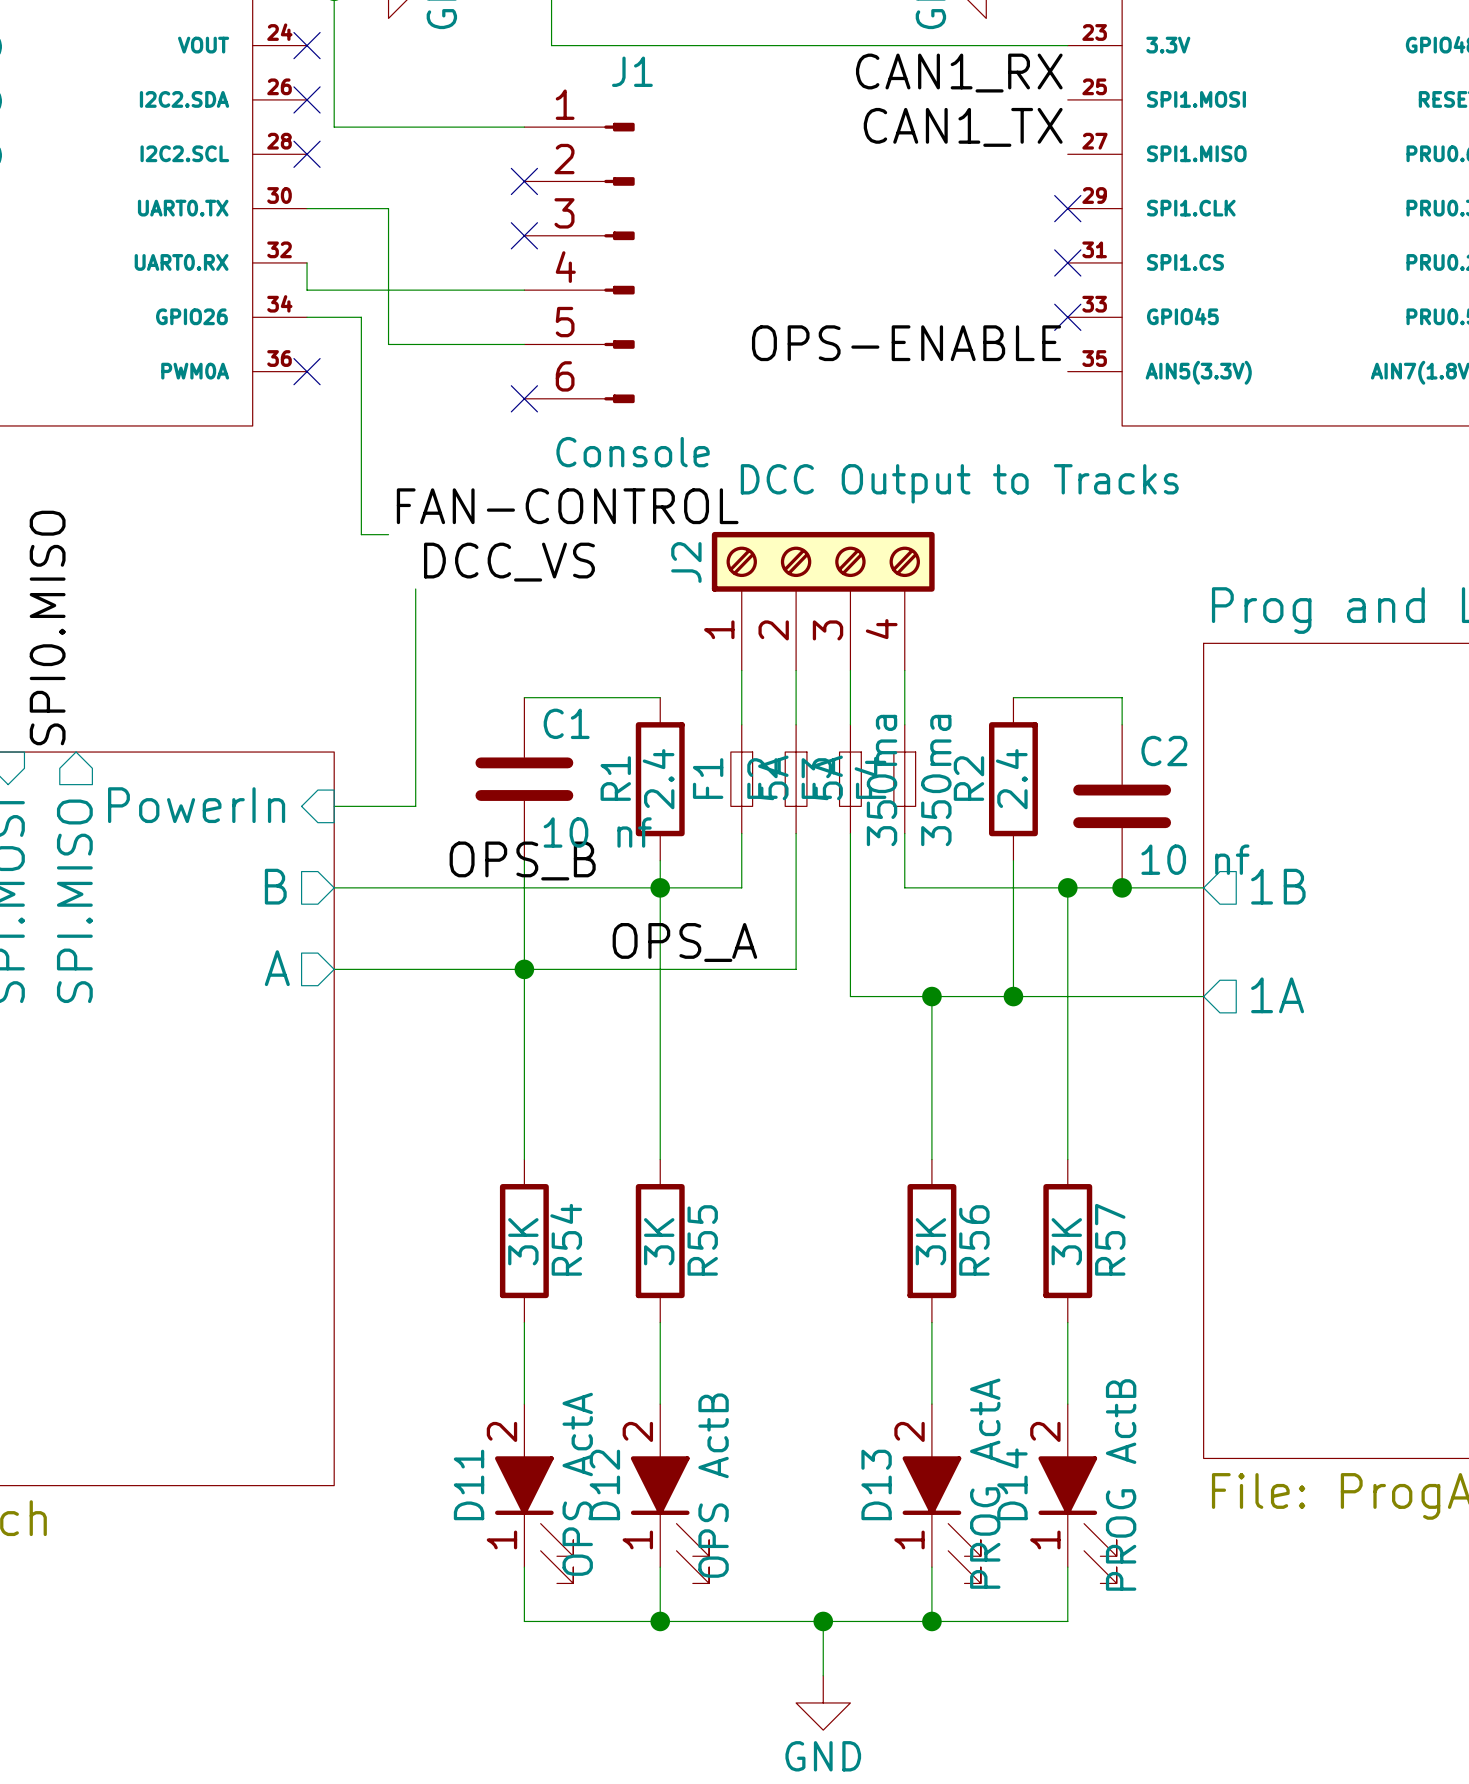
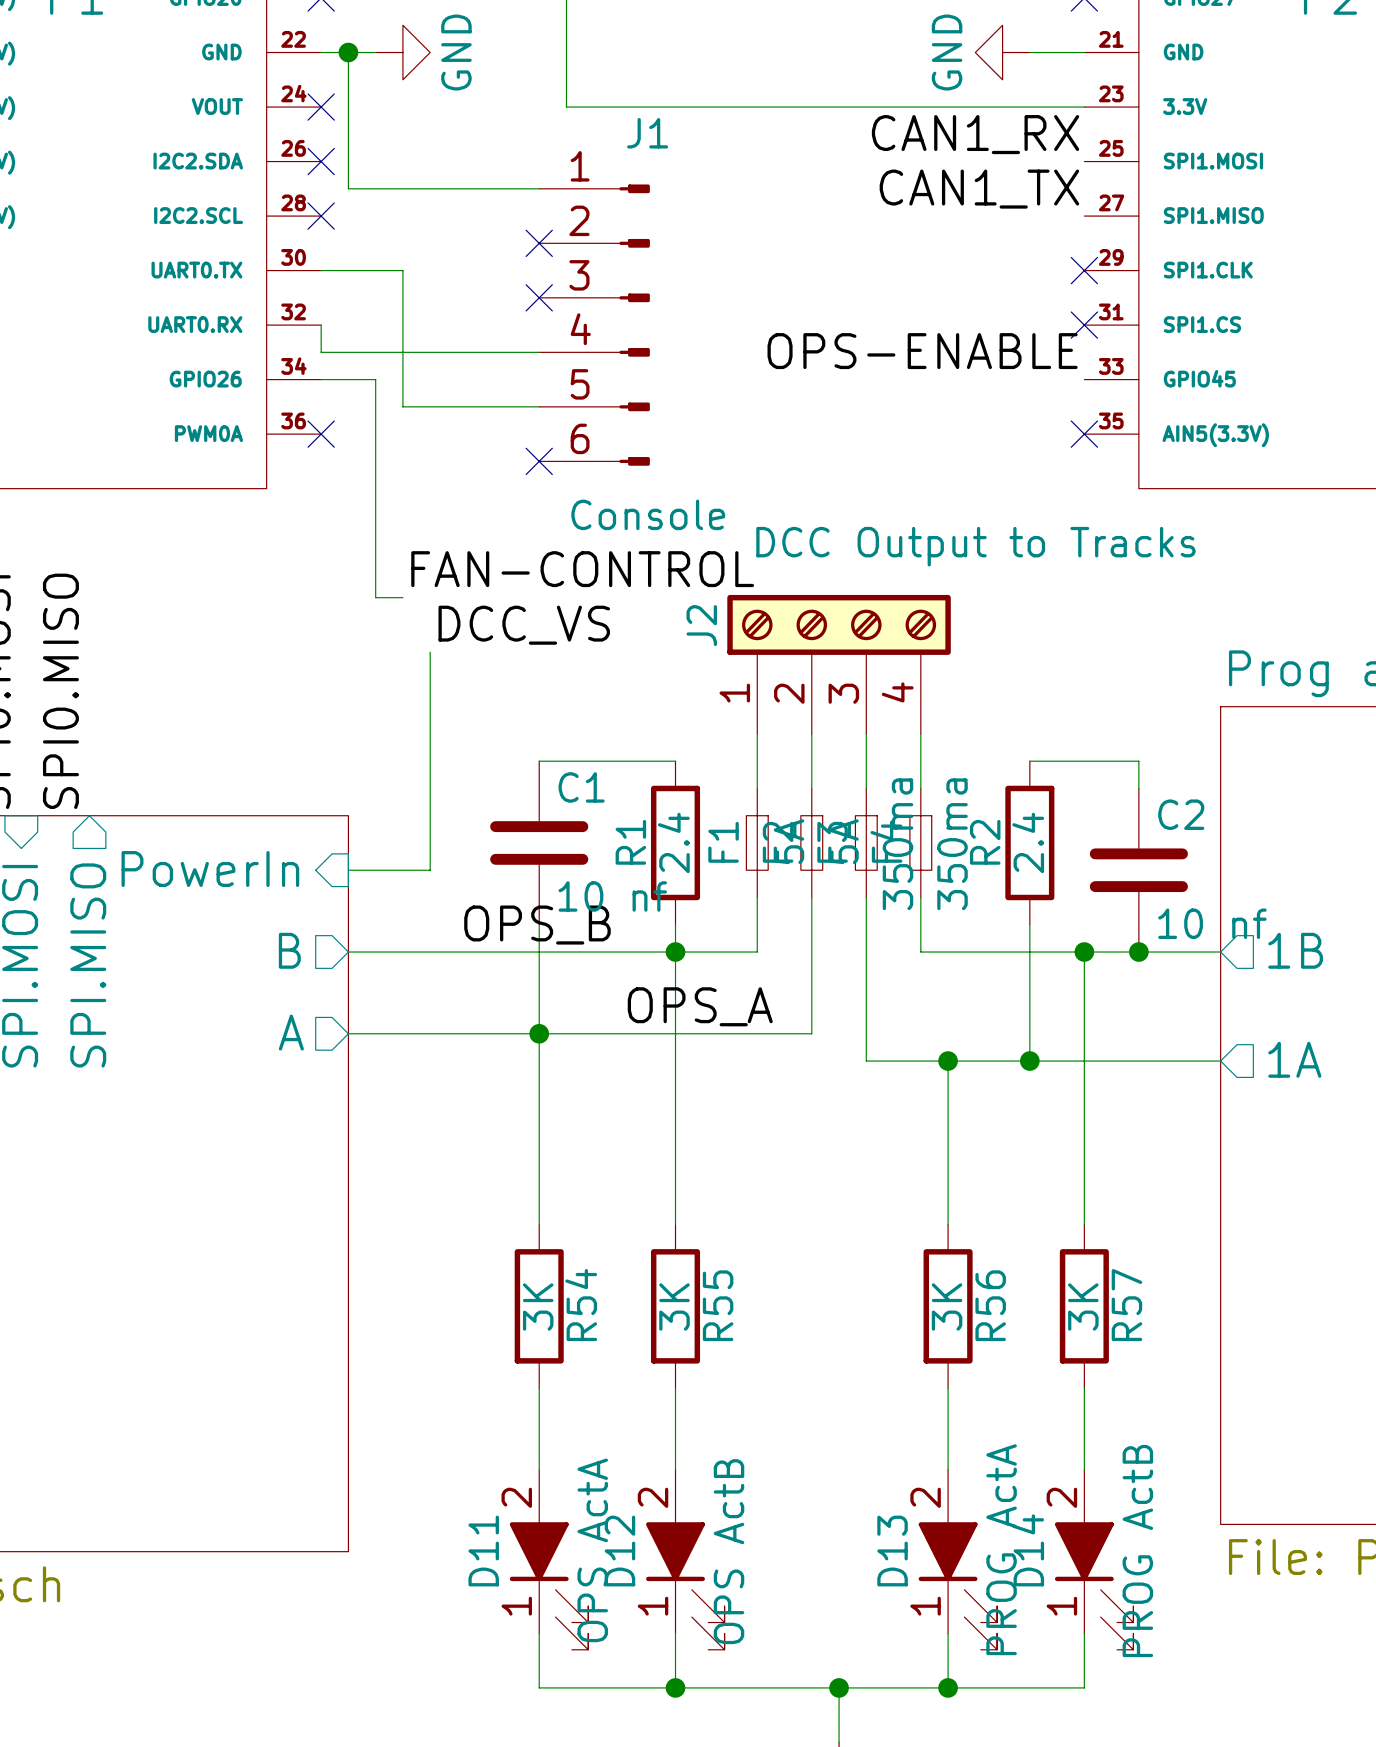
no-connect mark position: (1067, 317) -> (1084, 434)
label position: OPS-ENABLE (906, 343) -> OPS-ENABLE (922, 351)

